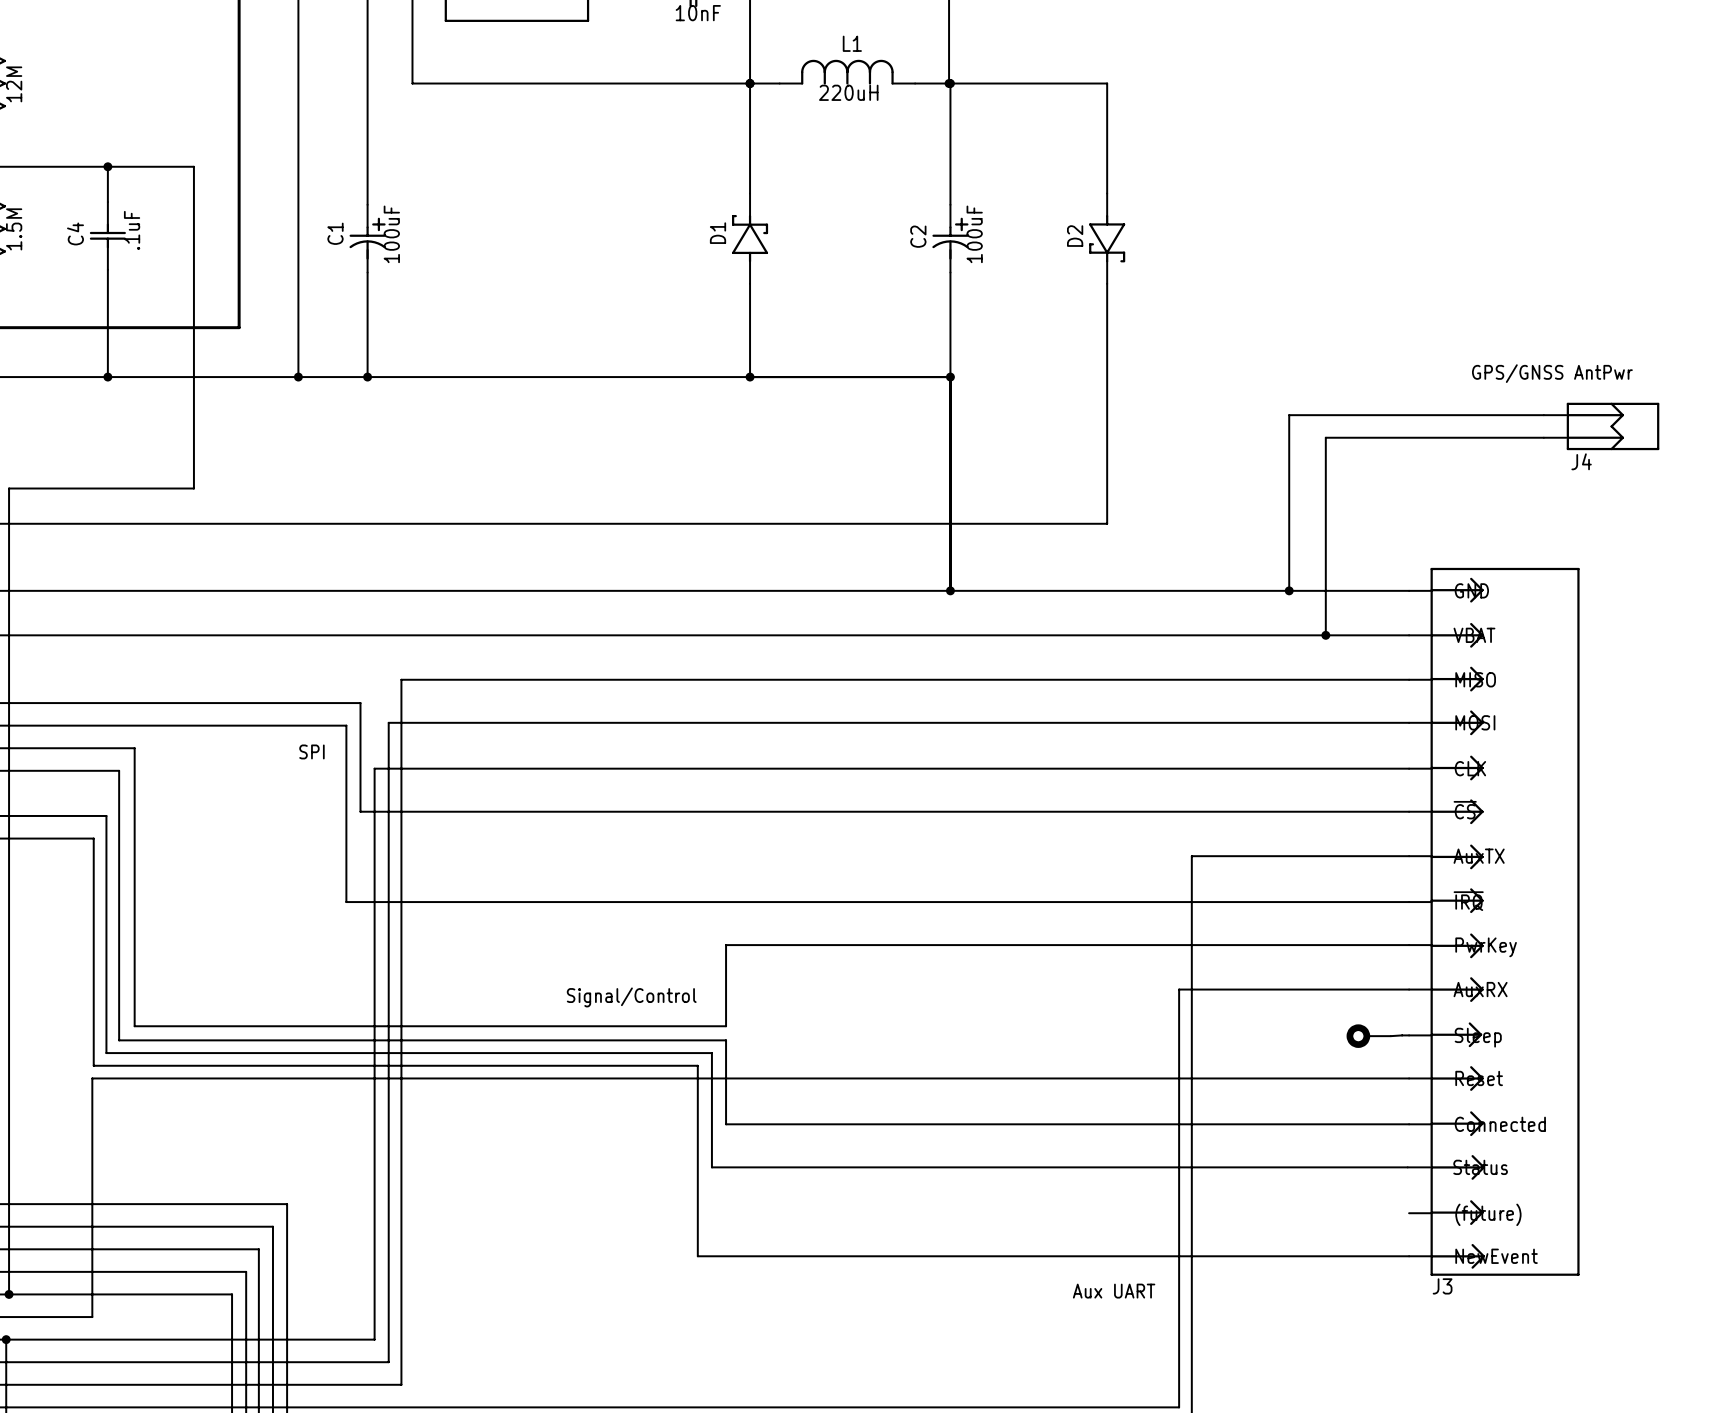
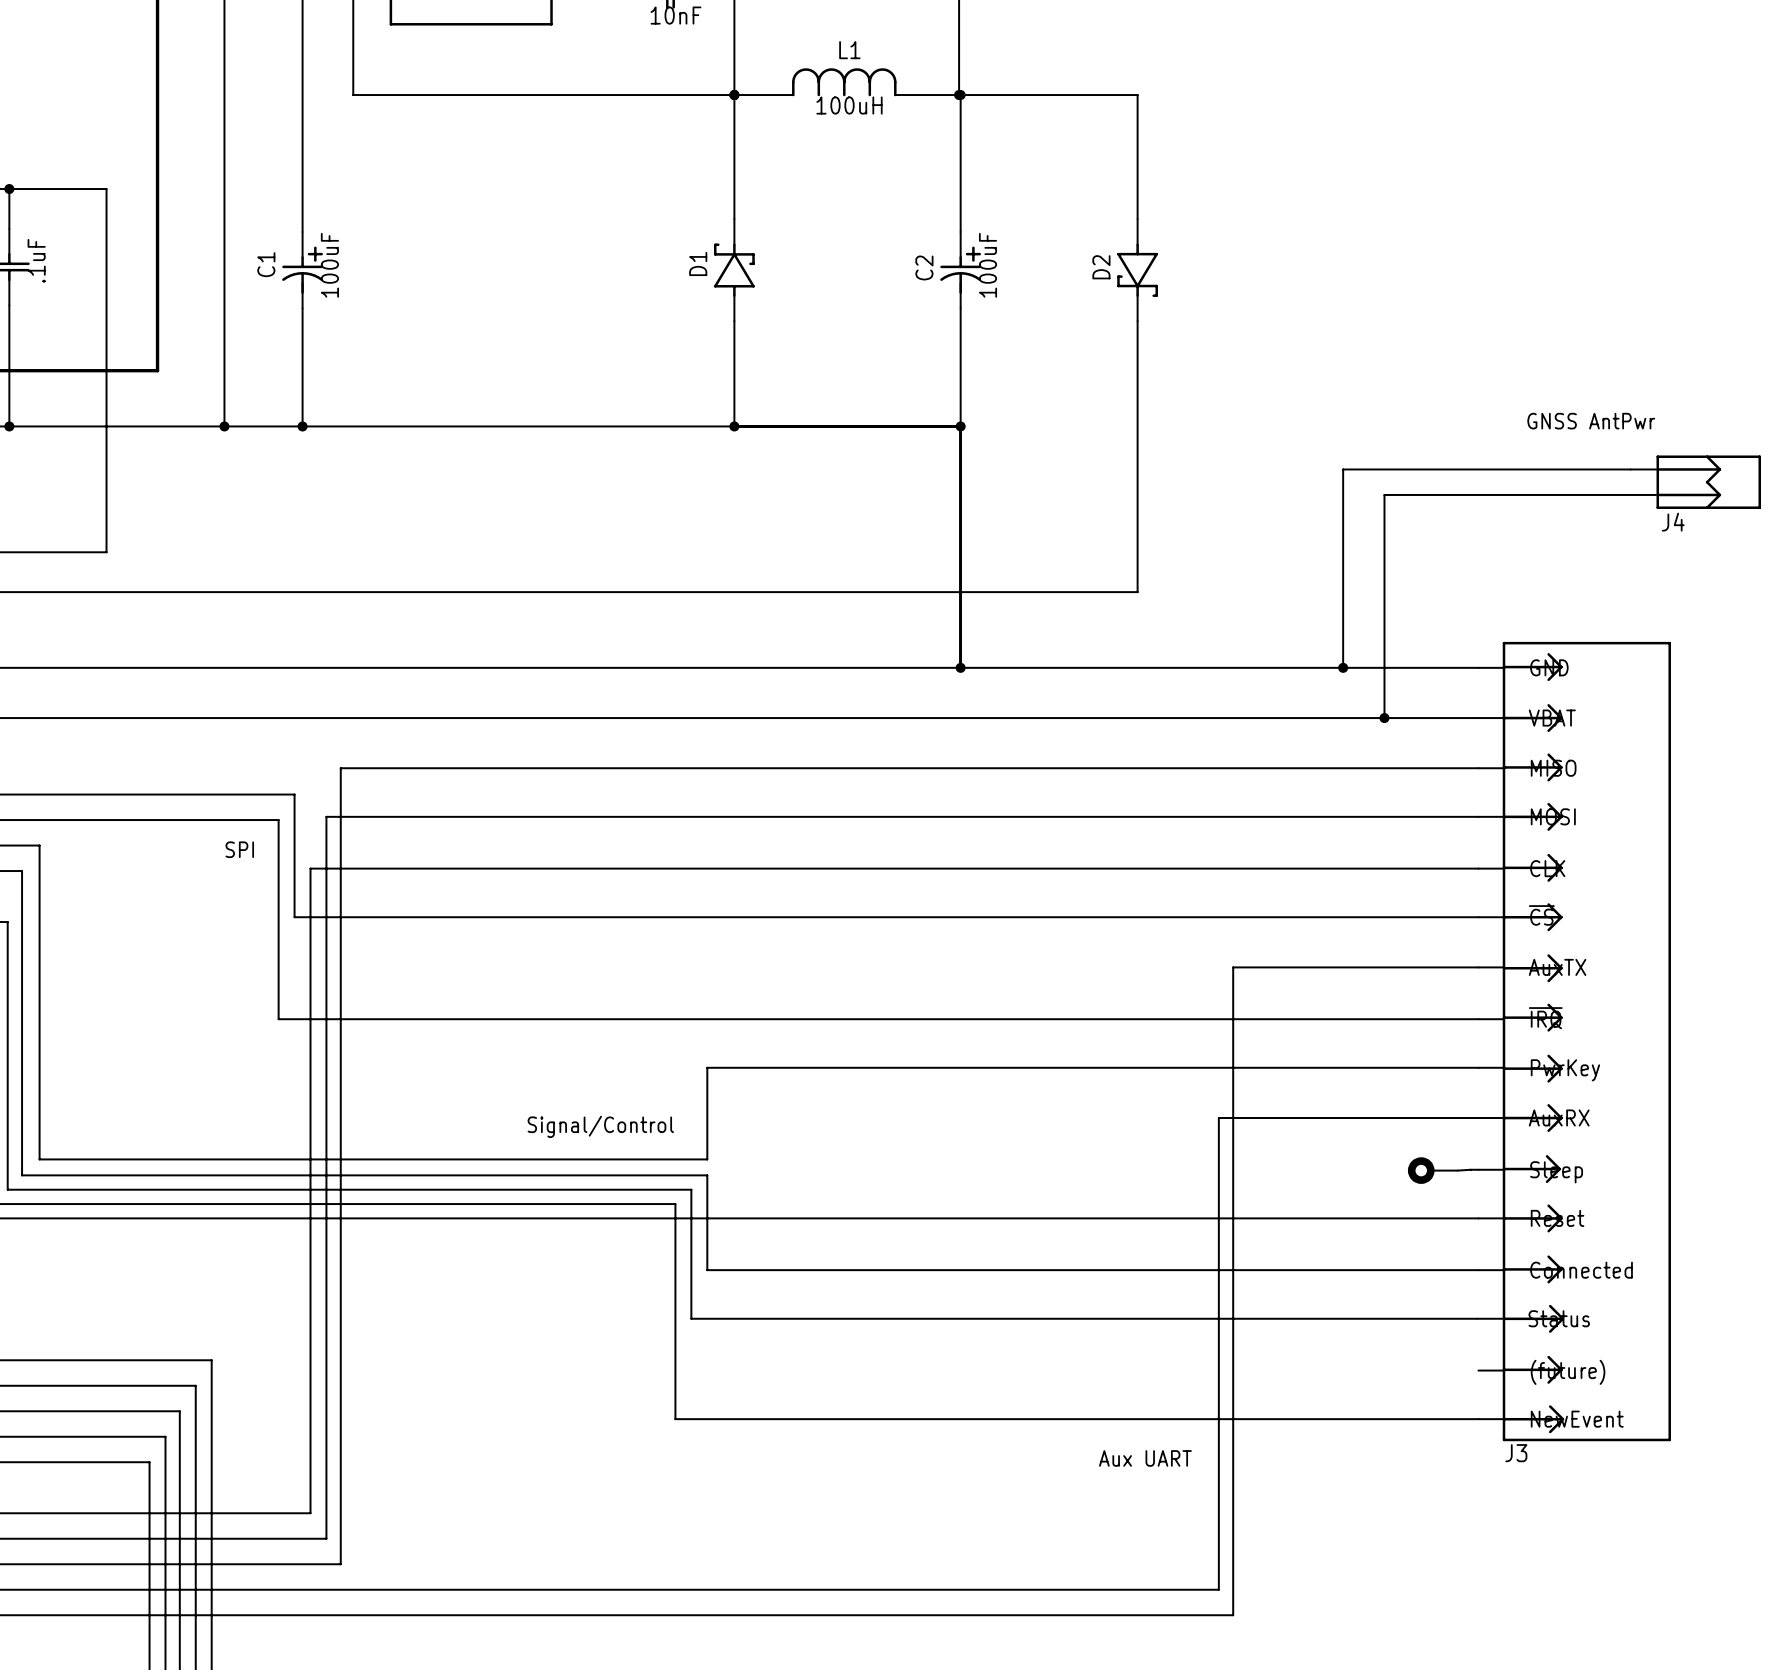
L1 value: 220uH (848, 92) -> 100uH (849, 105)
text: GPS/GNSS AntPwr (1552, 373) -> GNSS AntPwr (1591, 421)

